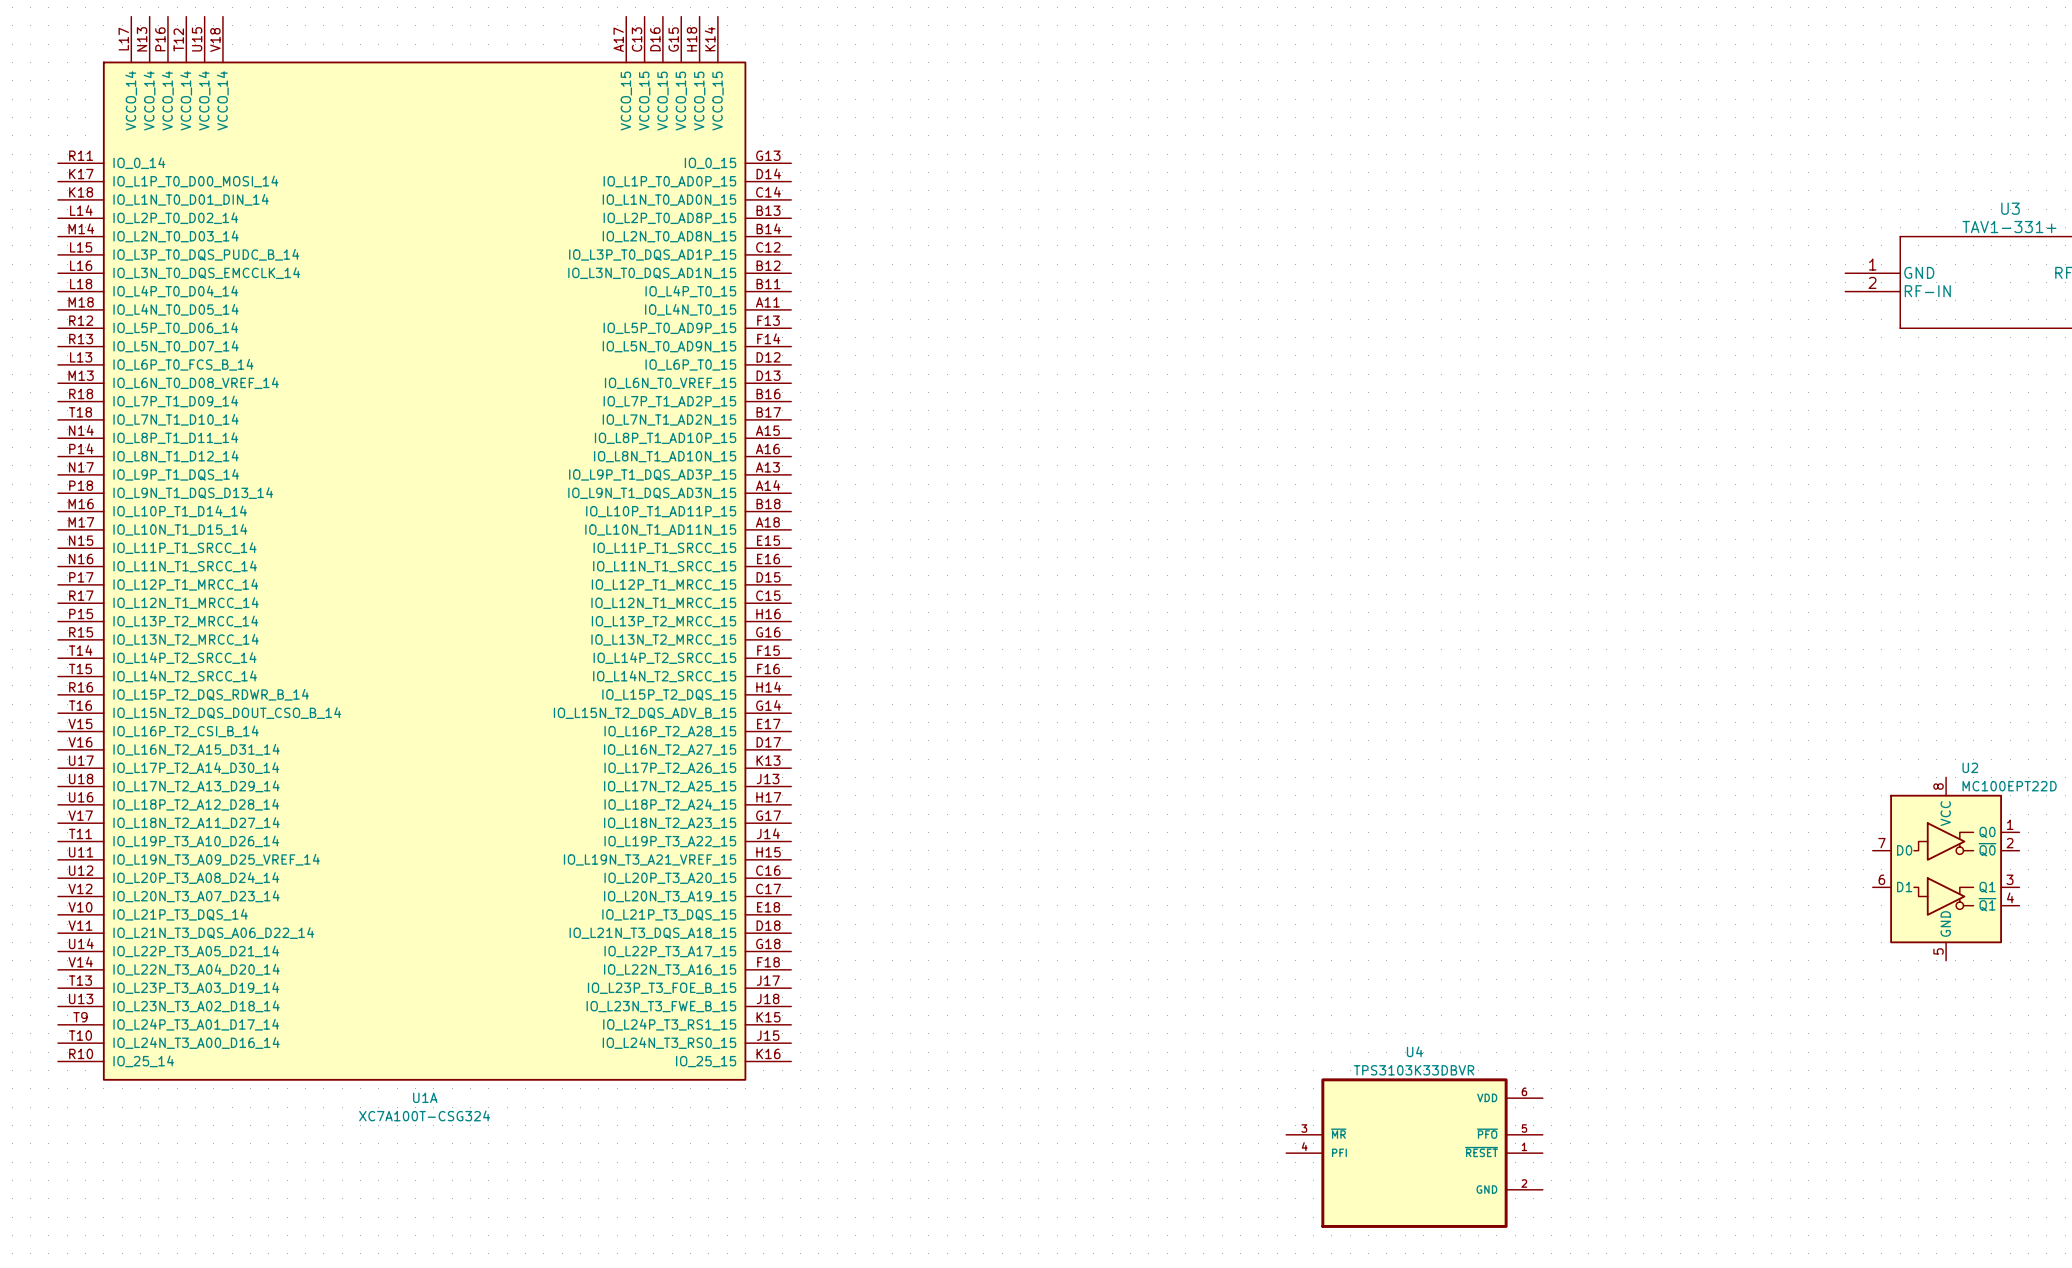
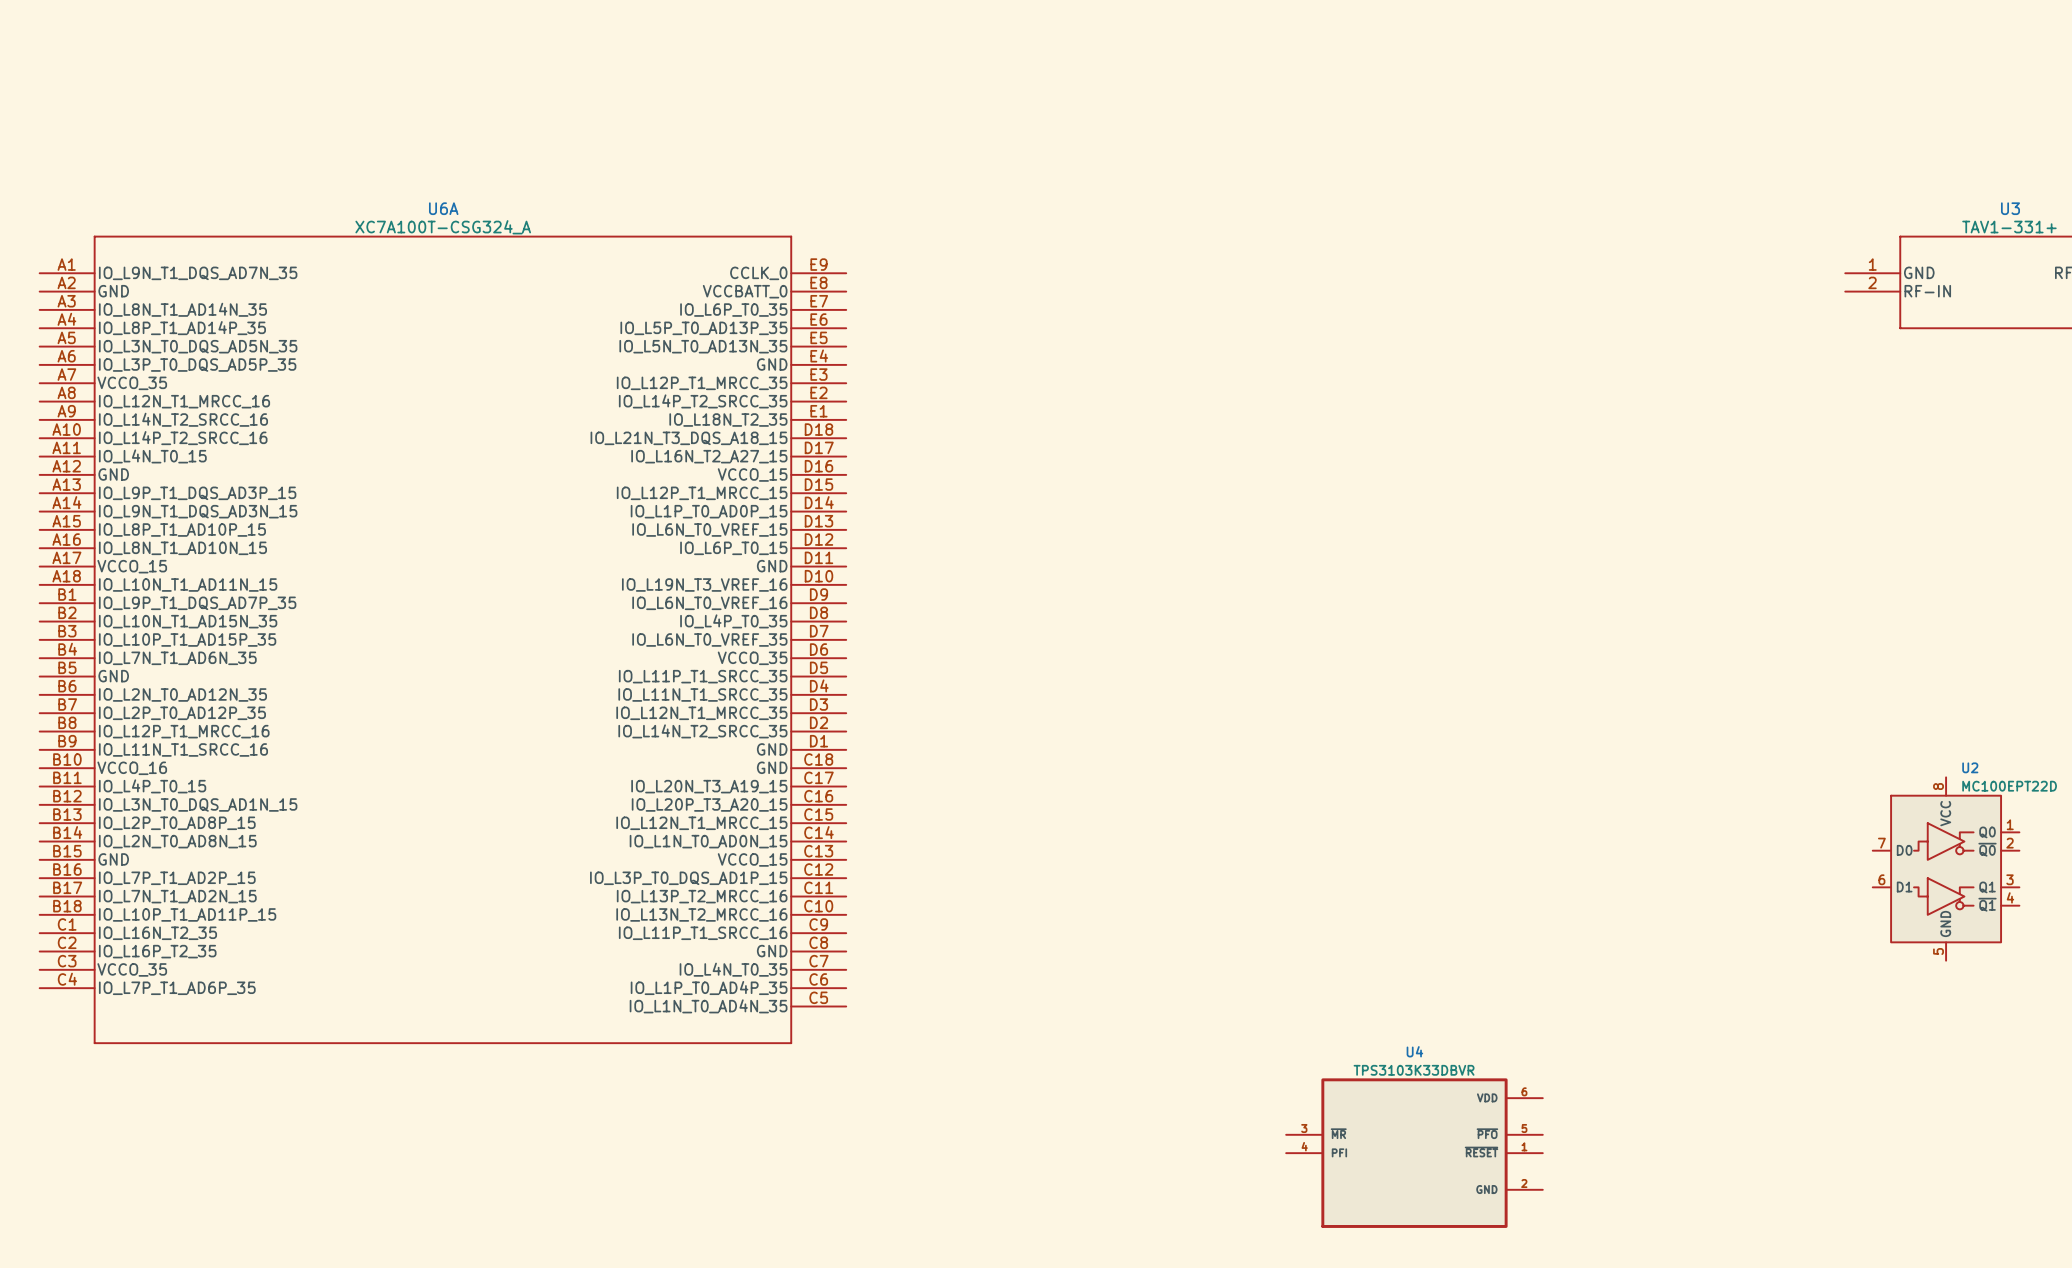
U1A: XC7A100T-CSG324 (424, 548) -> none
U6A: none -> XC7A100T-CSG324_A (442, 639)

